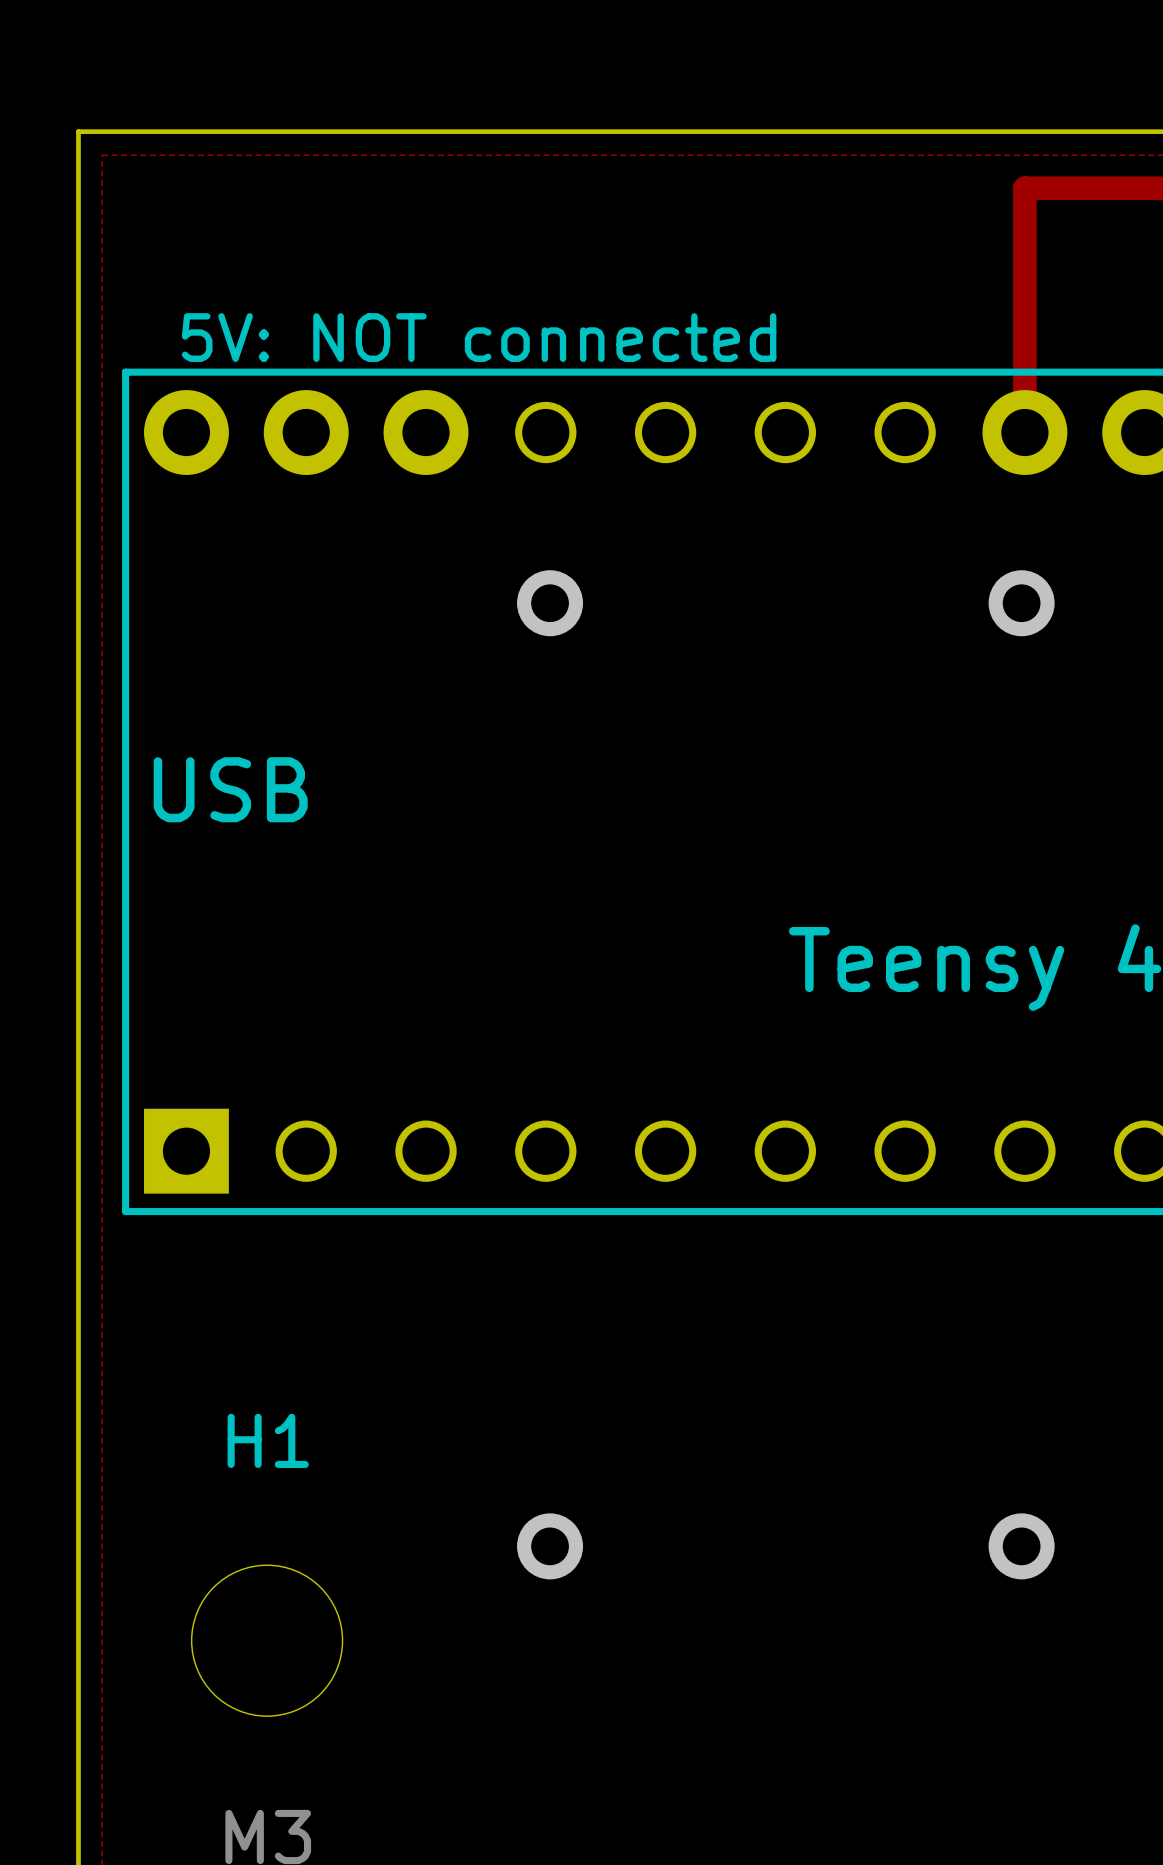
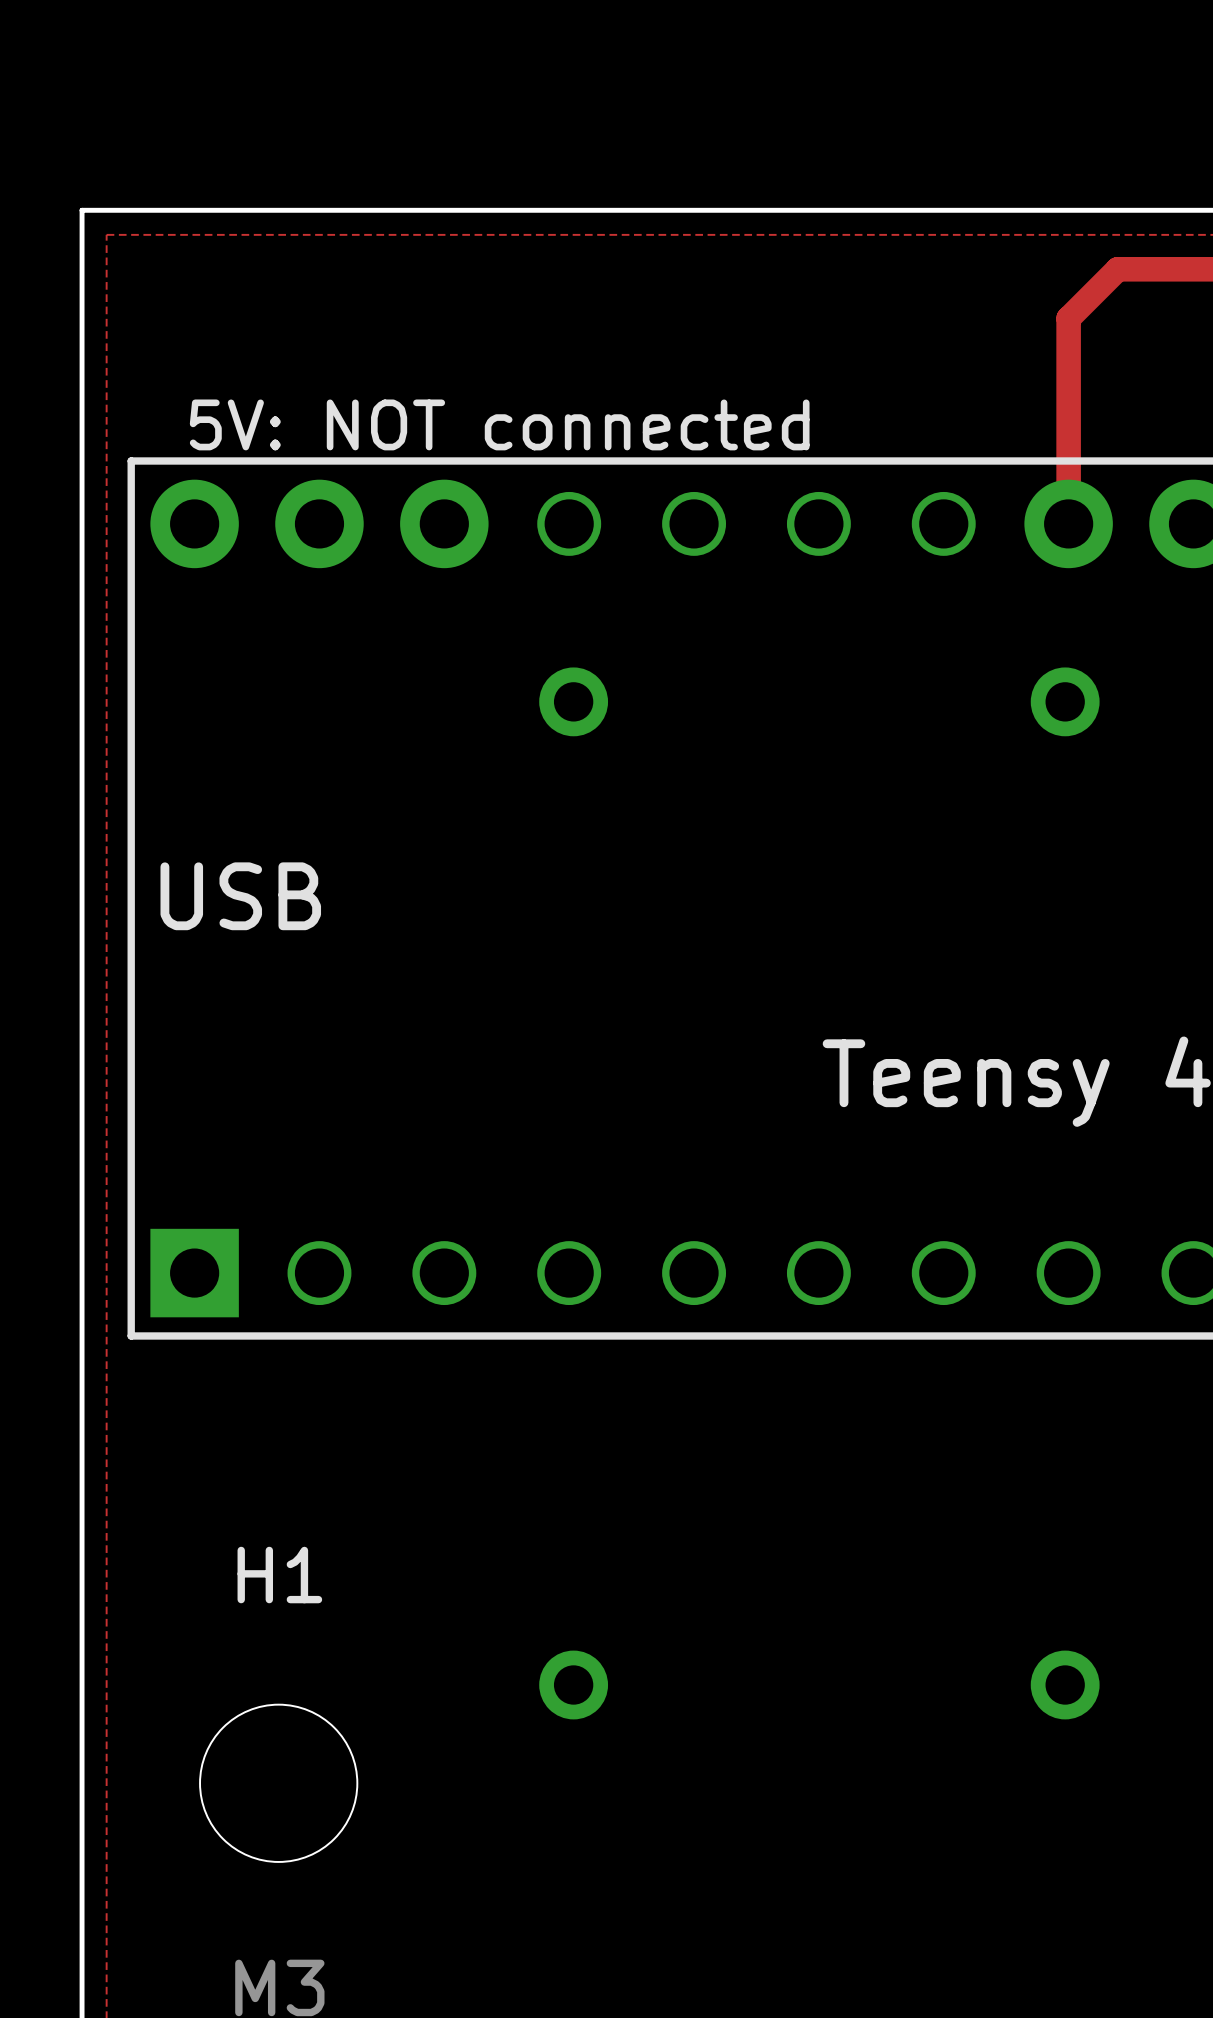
track: (1072, 188) (1024, 188) (1024, 235) -> (1117, 269) (1068, 318)

